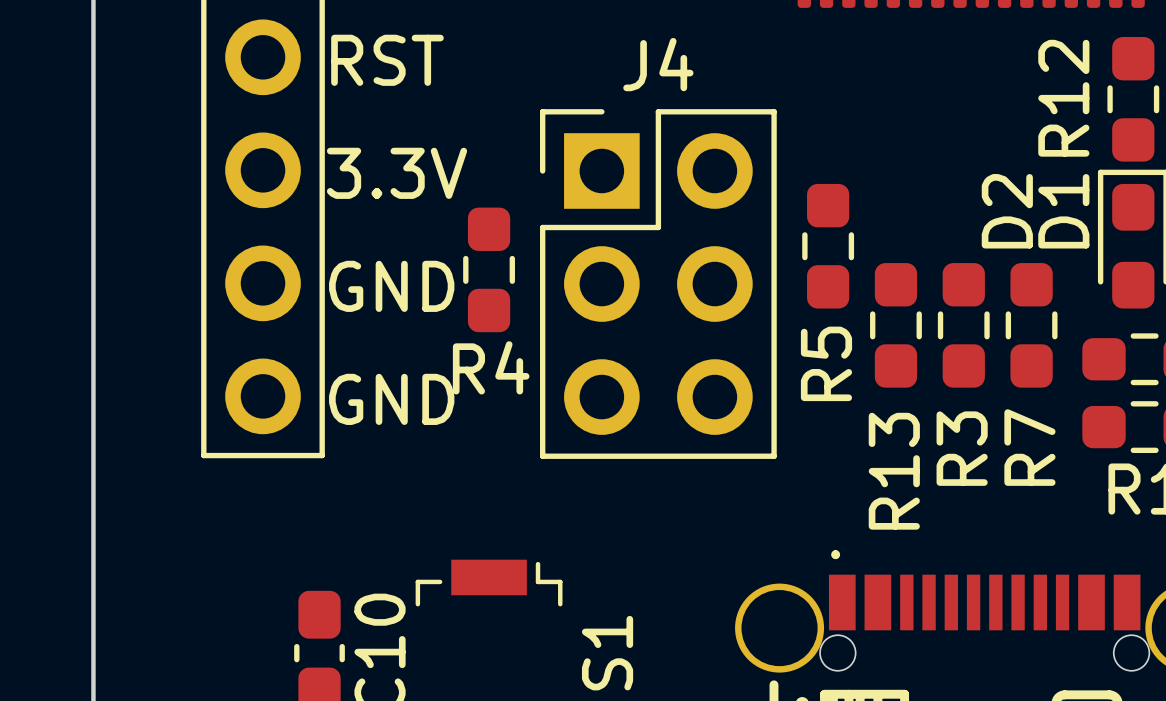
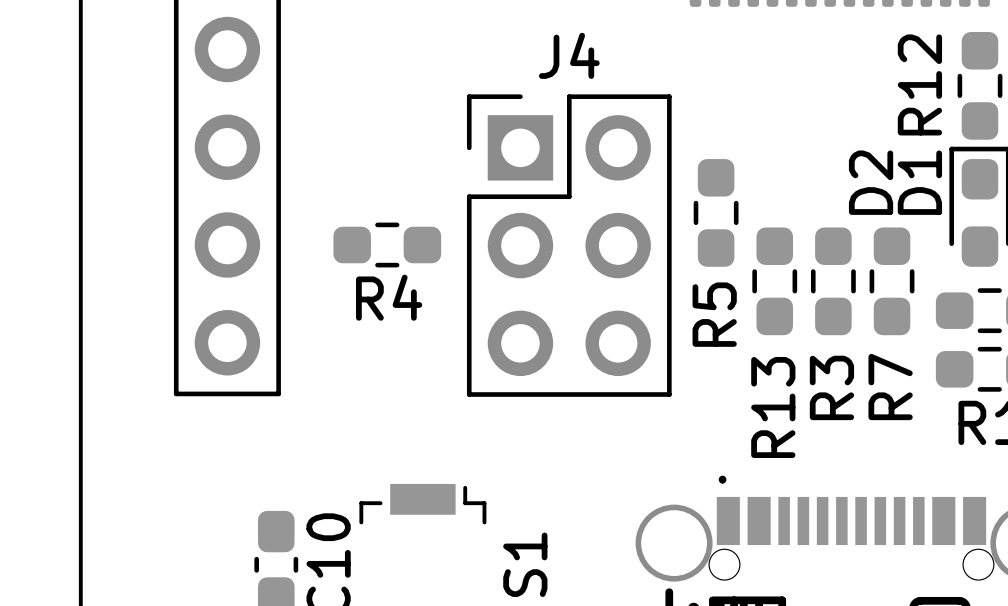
text: RST (387, 60) -> none
text: 3.3V (397, 173) -> none
R4 rotation: 0° (489, 269) -> 90° clockwise (387, 245)
text: GND (391, 286) -> none
text: GND (391, 399) -> none

